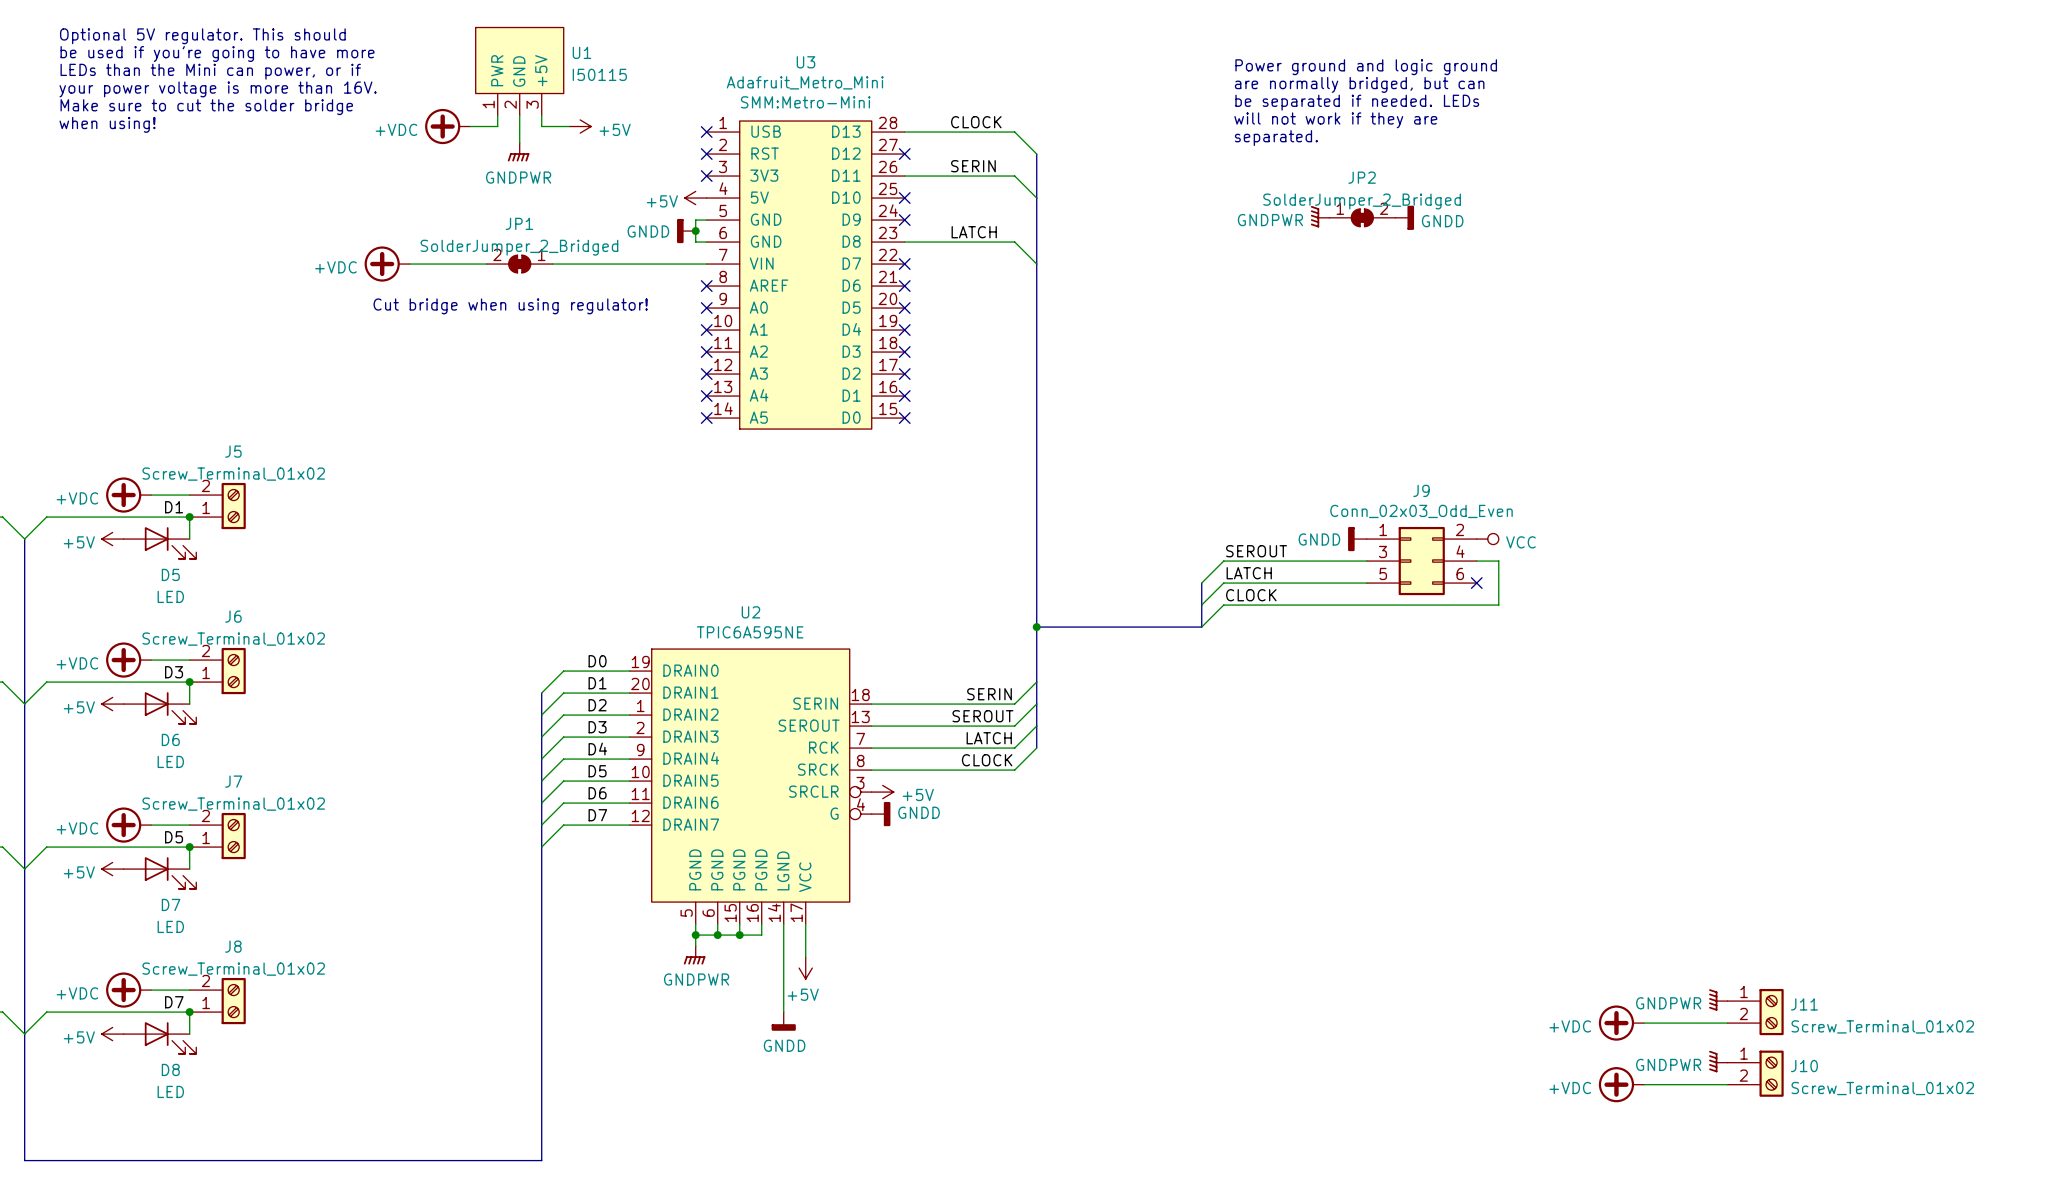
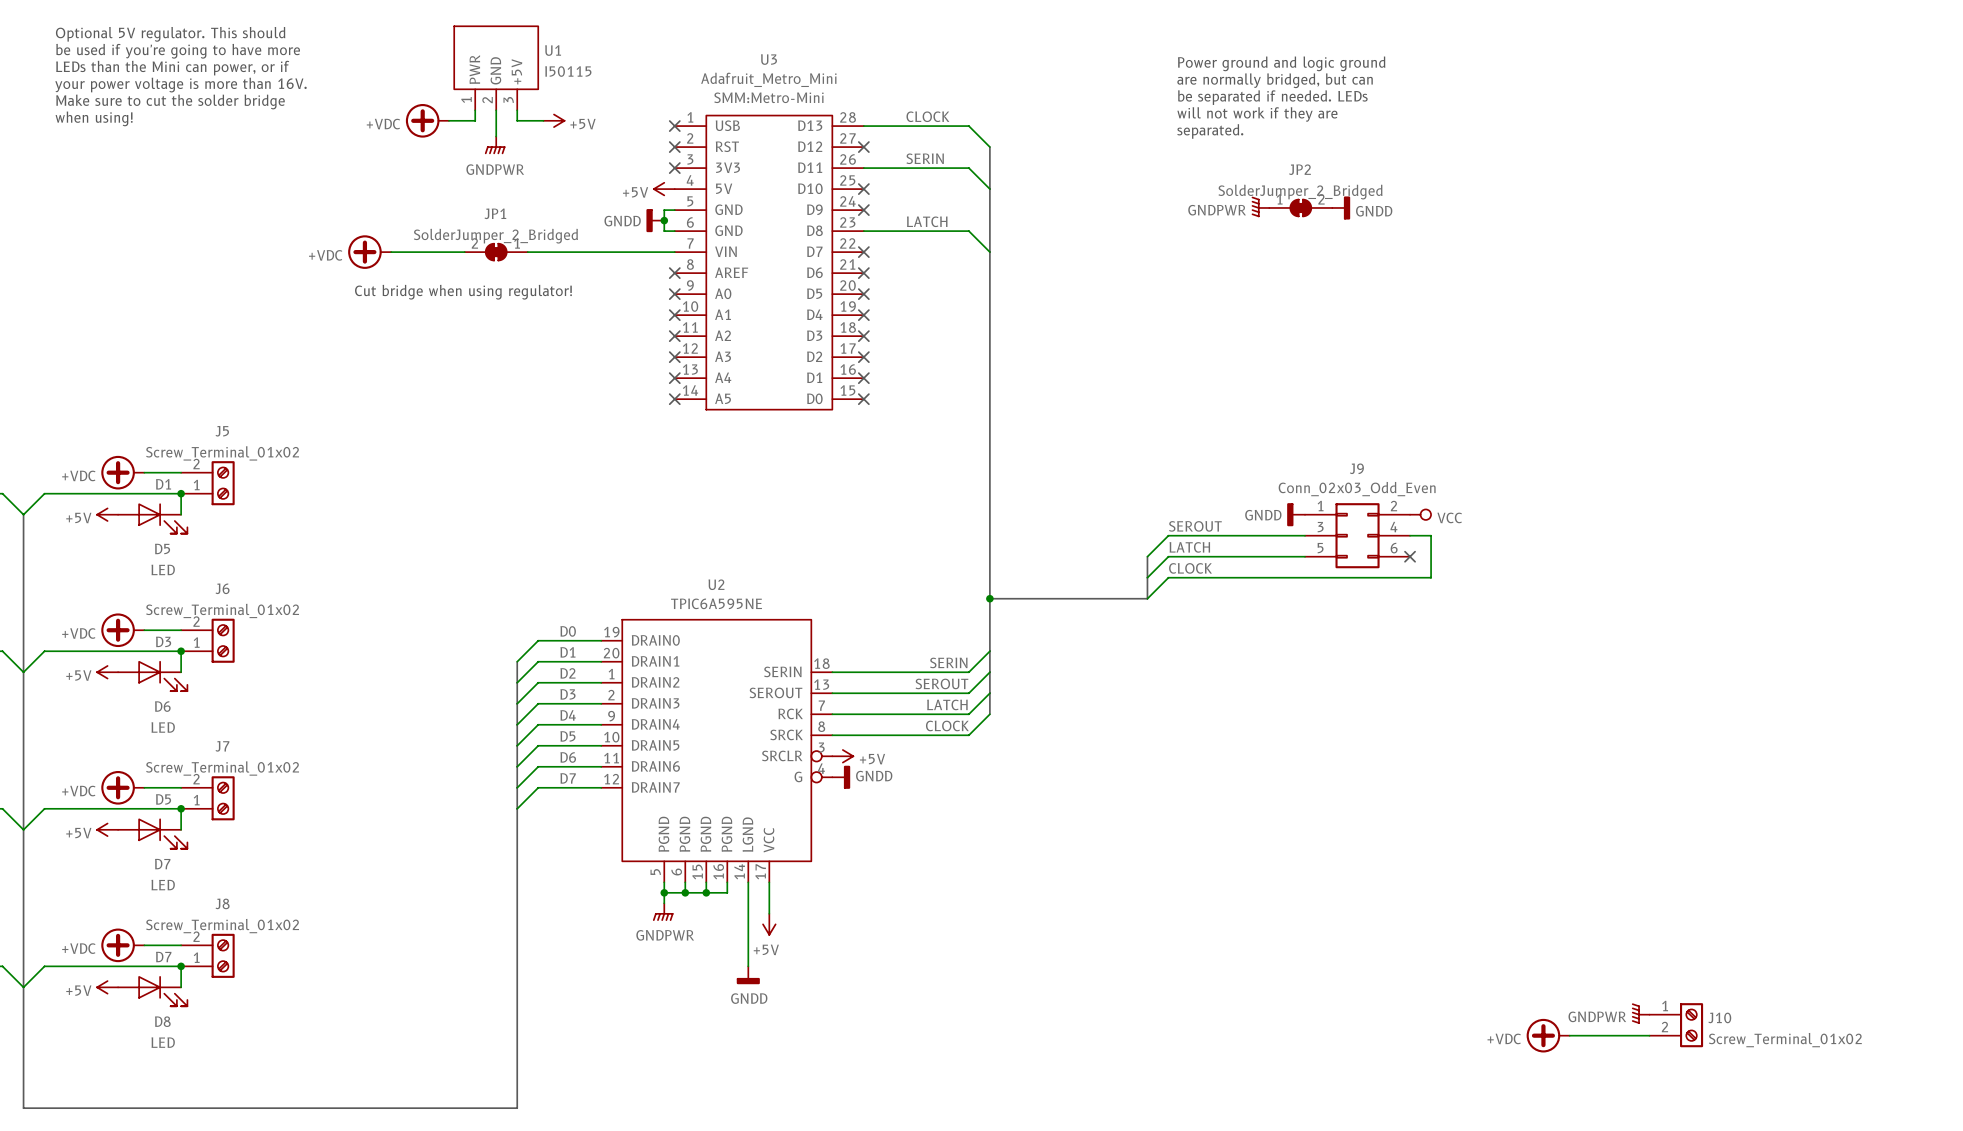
power symbol: GNDPWR (1718, 999) -> none
J11: Screw_Terminal_01x02 (1755, 1012) -> none
power symbol: +VDC (1621, 1023) -> none
wire: (1643, 1023) (1727, 1023) -> none

